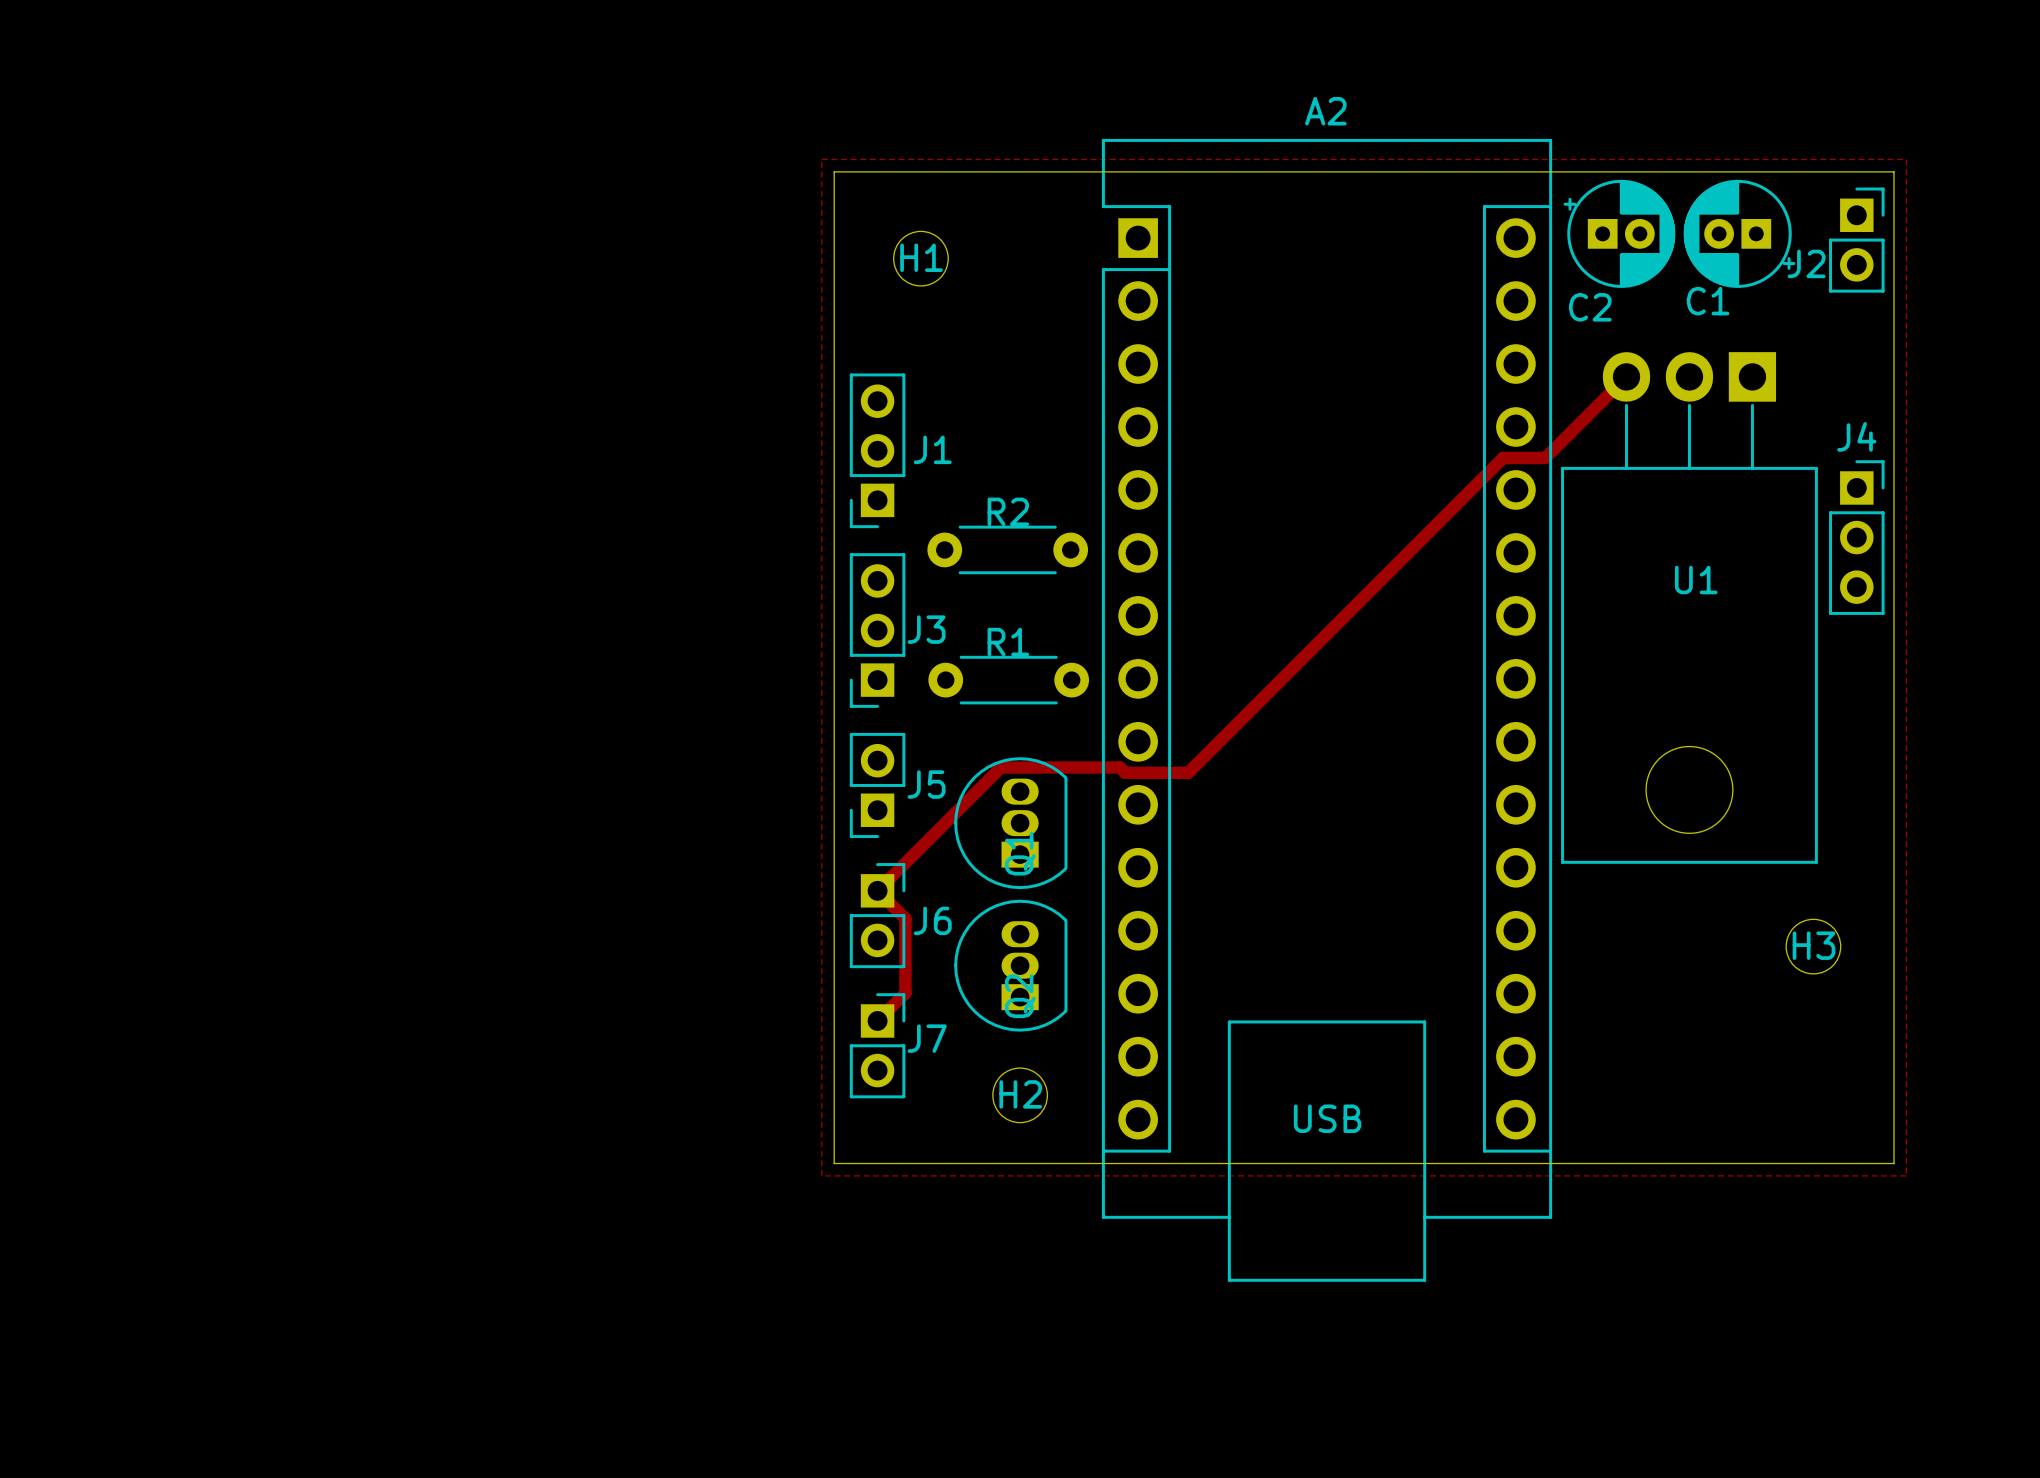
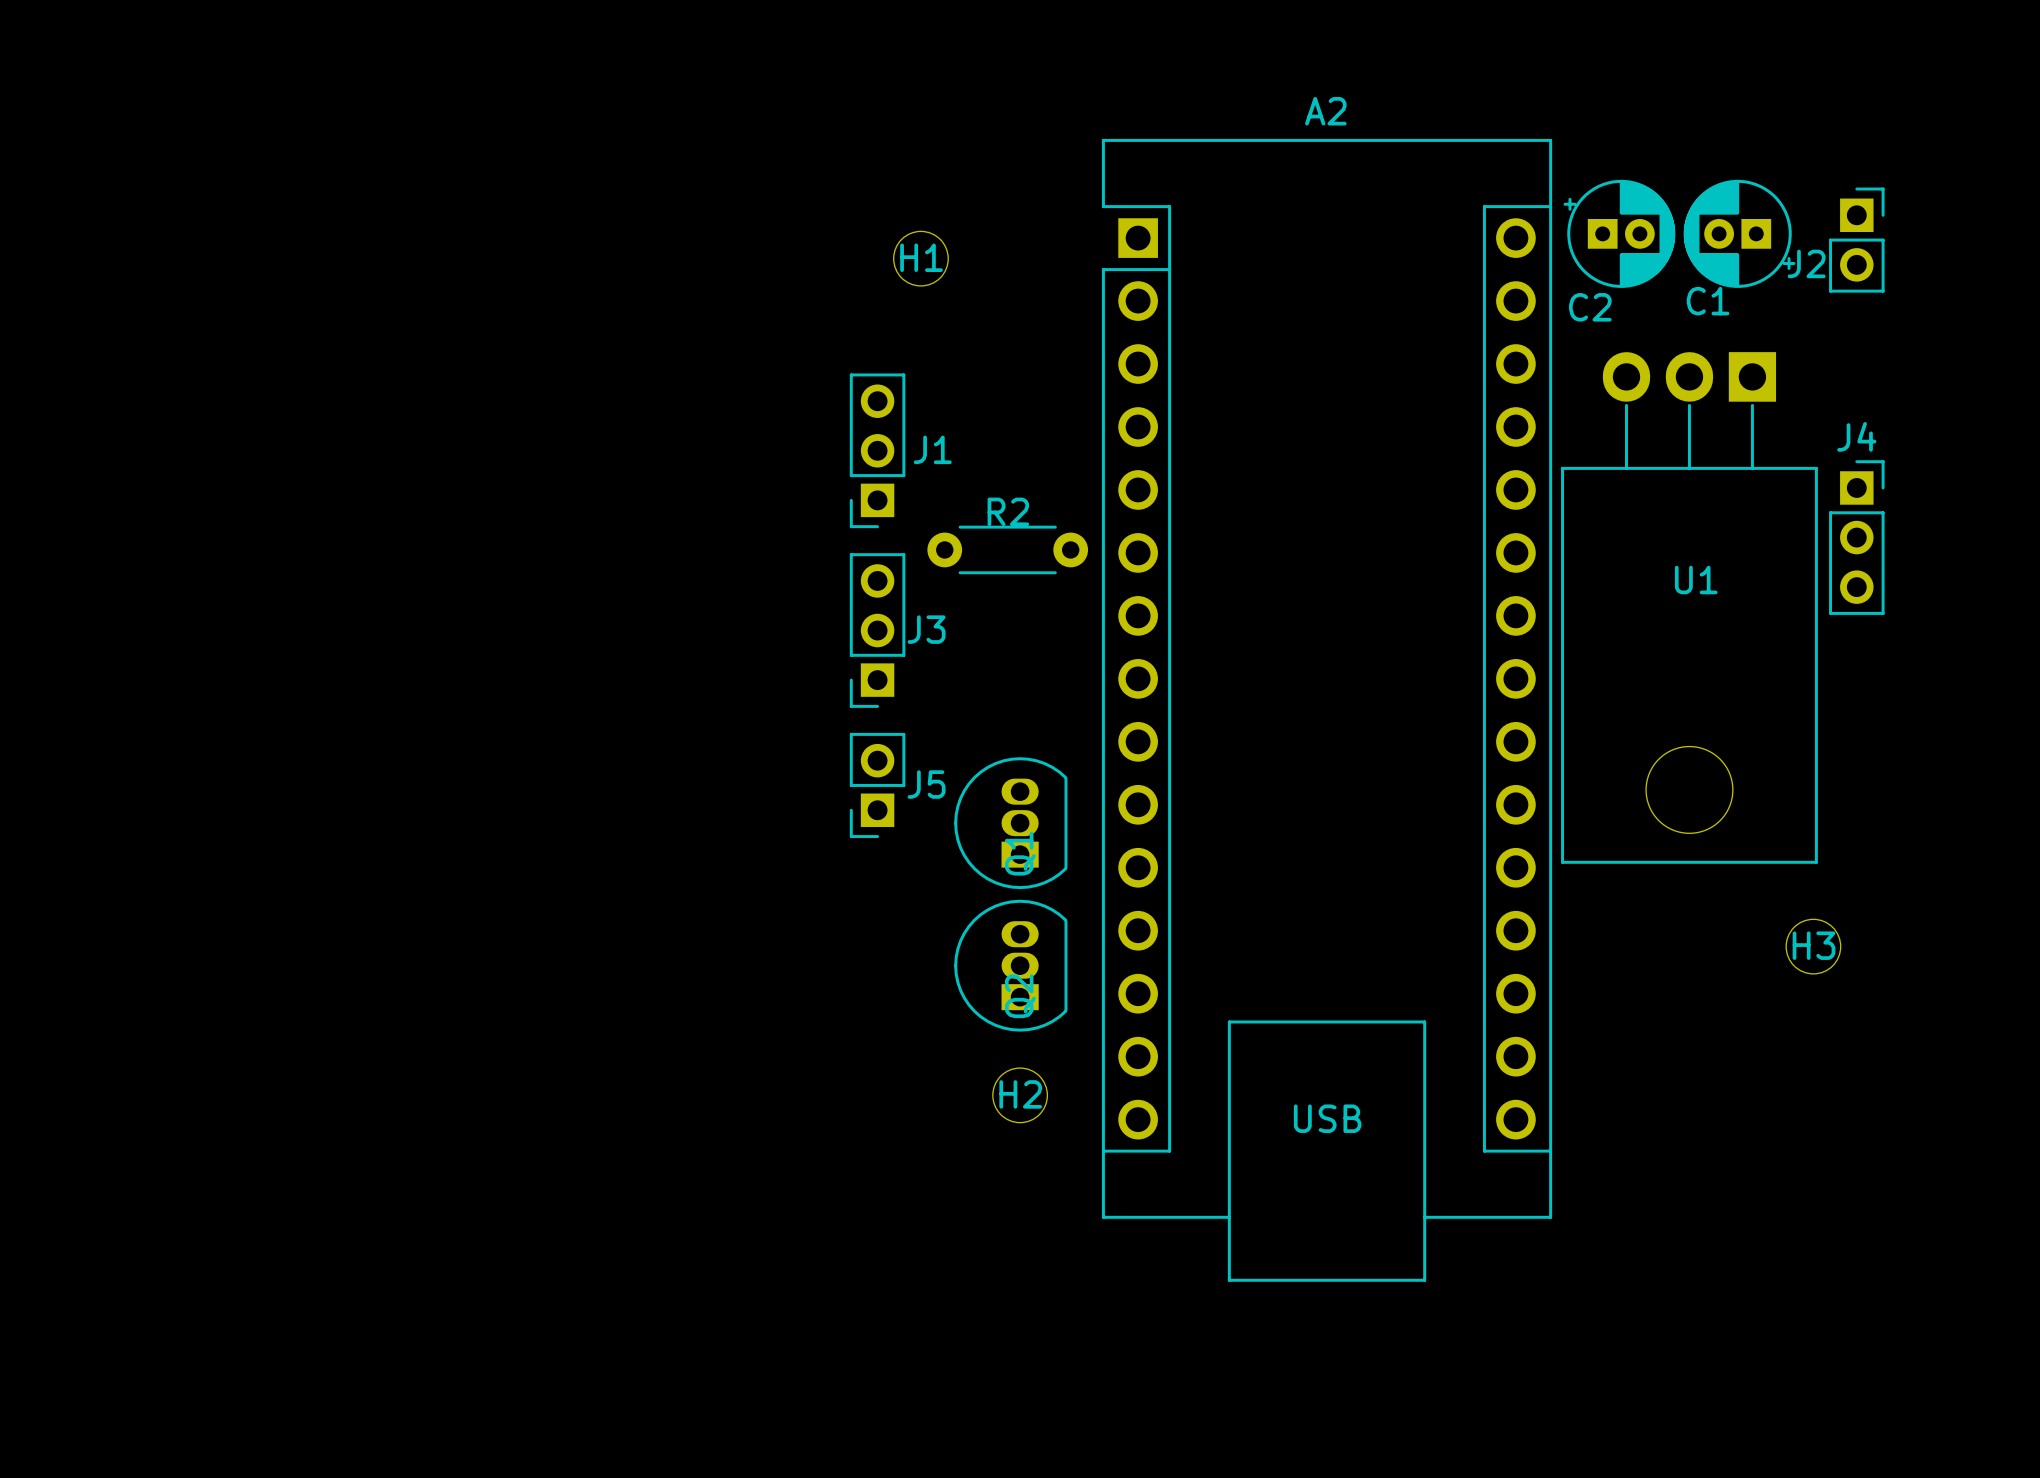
zone outline: (821, 159) (1906, 159) (1906, 1175) (821, 1175) (821, 159) -> none
board edge: (834, 171) (1893, 171) (1893, 1163) (834, 1163) (834, 171) -> none
track: (1626, 376) (1545, 457) (1503, 457) (1188, 772) (1125, 772) (1119, 767) (1000, 767) (877, 890) (905, 918) (905, 993) (877, 1020) -> none
R1: (1008, 680) -> none
J6: (877, 915) -> none
J7: (877, 1045) -> none

